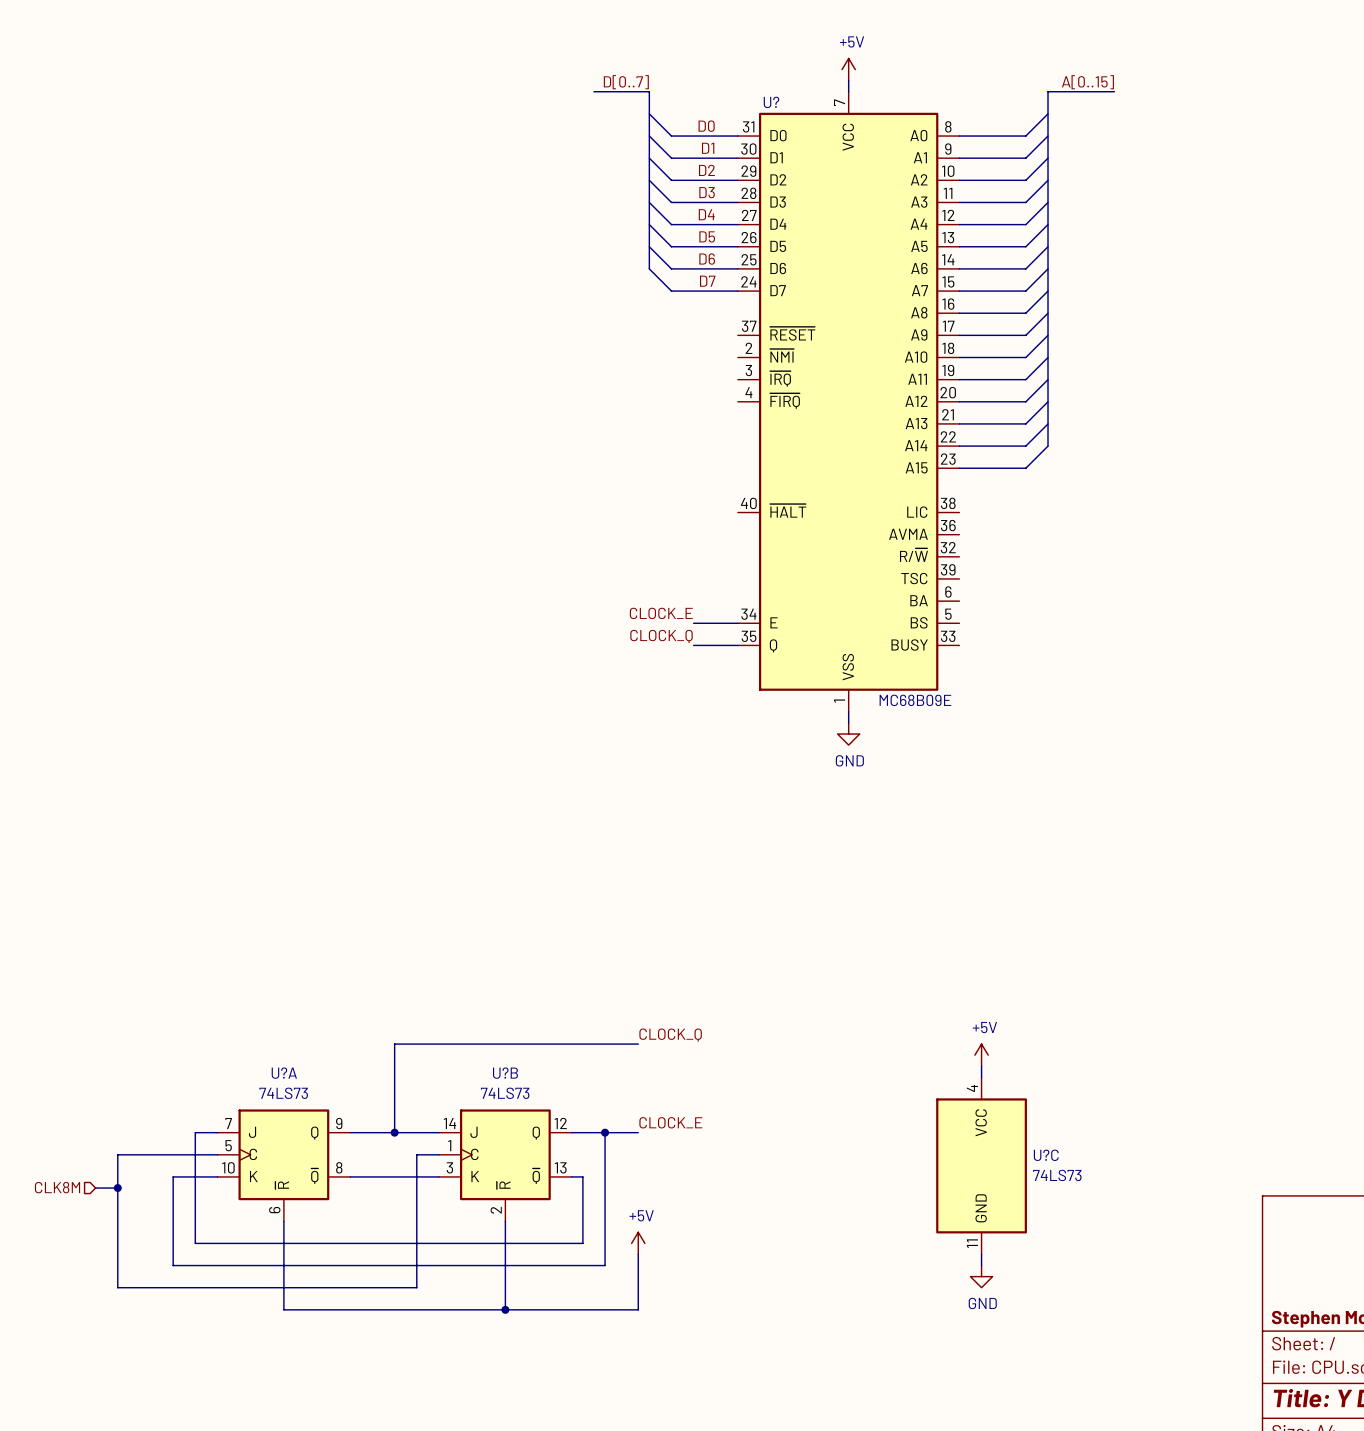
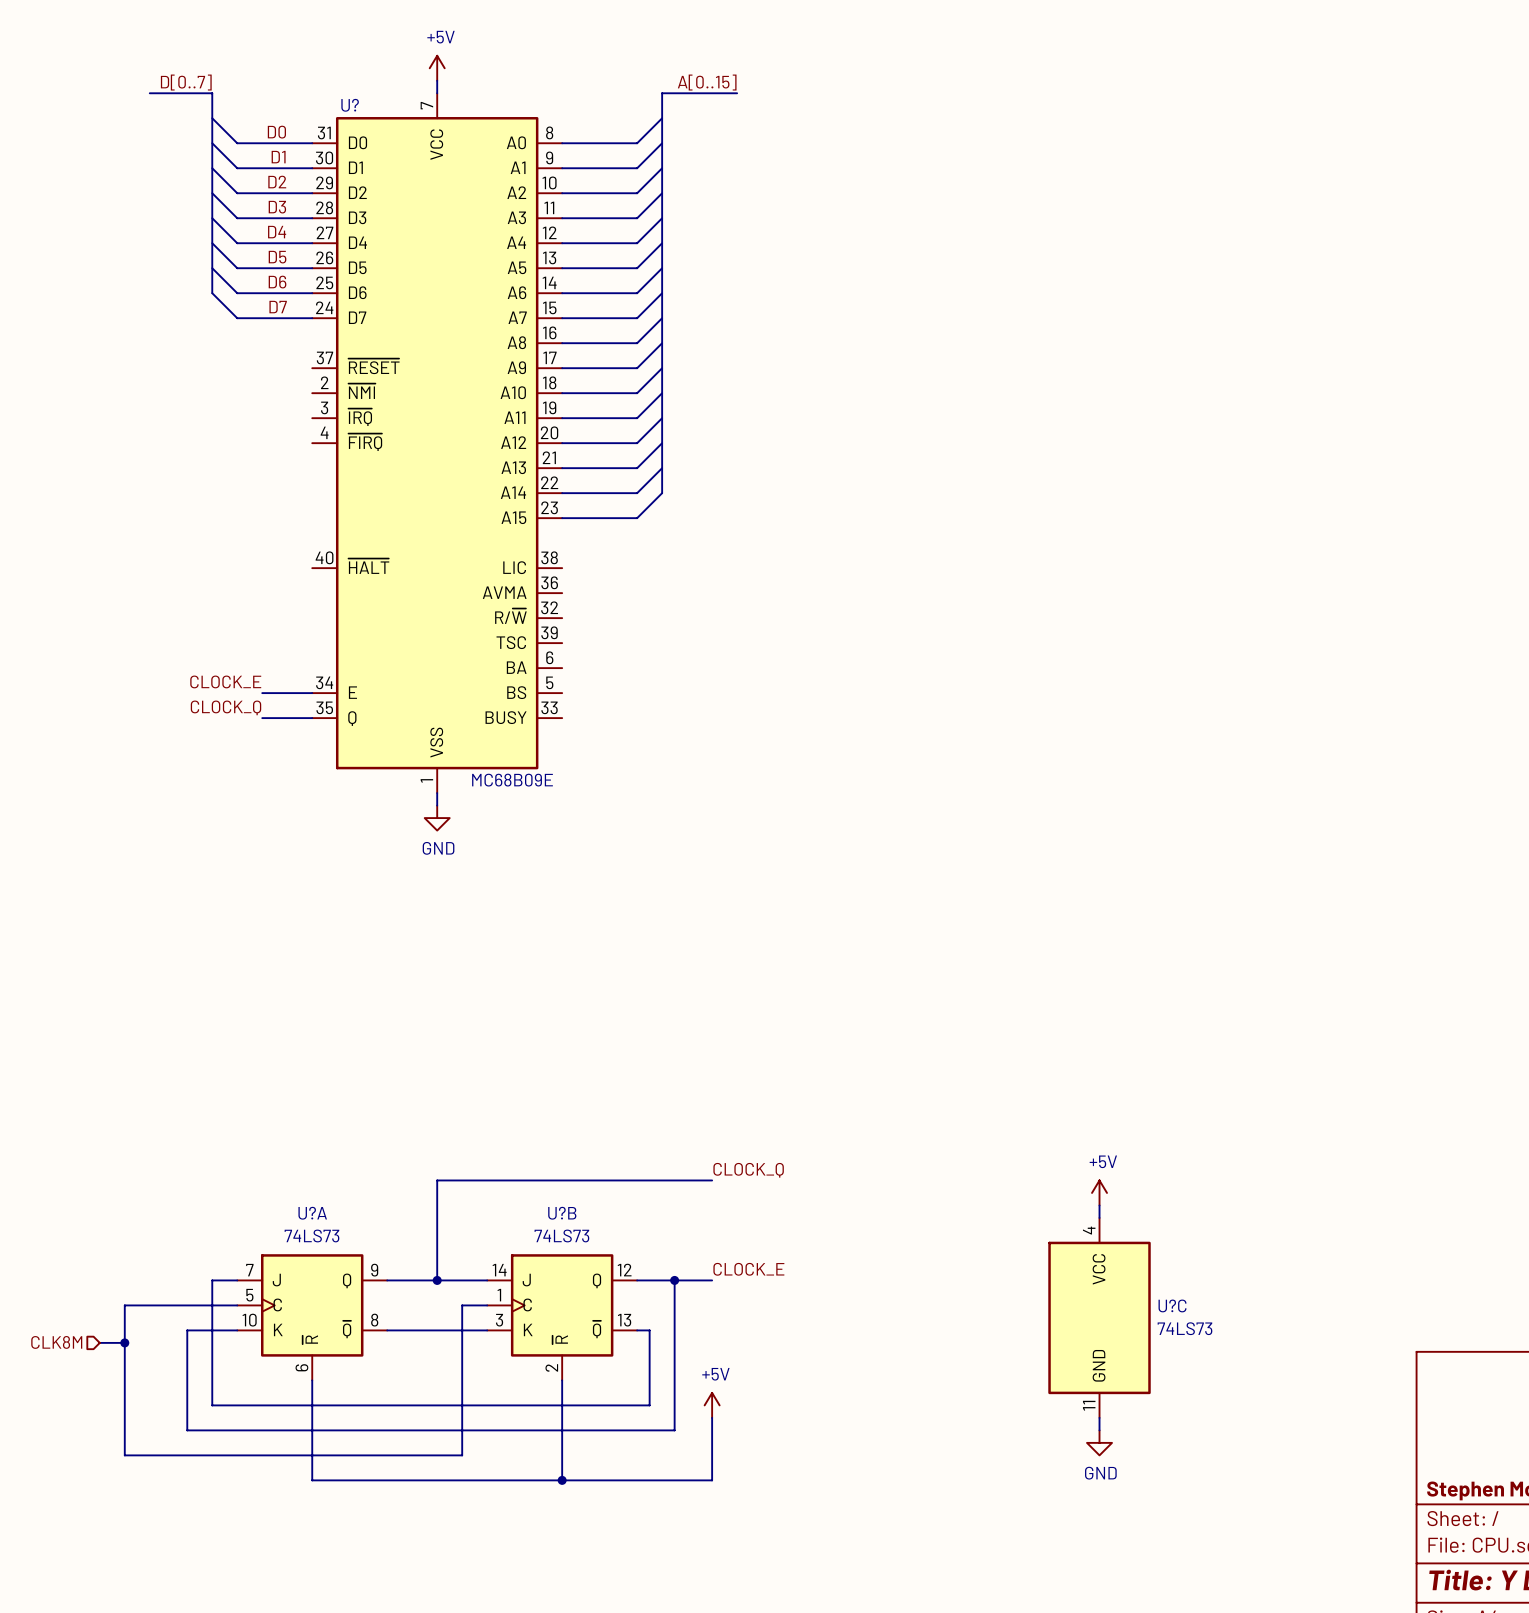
power symbol: none -> +5V (437, 68)
wire: none -> (437, 80) (437, 93)
power symbol: +5V (848, 69) -> none
label: none -> D[0..7] (186, 82)
bus: none -> (149, 93) (212, 93) (212, 293)
bus: none -> (737, 93) (662, 93) (662, 493)
wire: (848, 80) (848, 91) -> none
label: D[0..7] (626, 82) -> A[0..15] (707, 82)
label: A[0..15] (1087, 82) -> none
bus: (593, 91) (649, 91) (649, 268) -> none
bus: (1114, 91) (1048, 91) (1048, 446) -> none
wire: none -> (212, 118) (237, 143) (312, 143)
wire: none -> (662, 118) (637, 143) (562, 143)
wire: (649, 113) (671, 136) (737, 136) -> none
wire: (1048, 113) (1025, 136) (959, 136) -> none
label: none -> D0 (276, 132)
wire: none -> (212, 143) (237, 168) (312, 168)
wire: none -> (662, 143) (637, 168) (562, 168)
label: D0 (706, 126) -> none
wire: (649, 136) (671, 158) (737, 158) -> none
wire: (1048, 136) (1025, 158) (959, 158) -> none
label: none -> D1 (278, 157)
wire: none -> (212, 168) (237, 193) (312, 193)
wire: none -> (662, 168) (637, 193) (562, 193)
label: D1 (708, 148) -> none
wire: (649, 158) (671, 180) (737, 180) -> none
wire: (1048, 158) (1025, 180) (959, 180) -> none
label: none -> D2 (277, 182)
wire: none -> (212, 193) (237, 218) (312, 218)
wire: none -> (662, 193) (637, 218) (562, 218)
label: D2 (706, 170) -> none
wire: (649, 180) (671, 202) (737, 202) -> none
wire: (1048, 180) (1025, 202) (959, 202) -> none
label: none -> D3 (277, 207)
wire: none -> (212, 218) (237, 243) (312, 243)
wire: none -> (662, 218) (637, 243) (562, 243)
label: D3 (707, 192) -> none
wire: (649, 202) (671, 224) (737, 224) -> none
wire: (1048, 202) (1025, 224) (959, 224) -> none
label: none -> D4 (277, 232)
wire: none -> (212, 243) (237, 268) (312, 268)
wire: none -> (662, 243) (637, 268) (562, 268)
label: D4 (706, 214) -> none
wire: (649, 224) (671, 246) (737, 246) -> none
wire: (1048, 224) (1025, 246) (959, 246) -> none
label: none -> D5 (277, 257)
wire: none -> (212, 268) (237, 293) (312, 293)
wire: none -> (662, 268) (637, 293) (562, 293)
label: D5 (707, 236) -> none
wire: (649, 246) (671, 268) (737, 268) -> none
wire: (1048, 246) (1025, 268) (959, 268) -> none
label: none -> D6 (277, 282)
wire: none -> (212, 293) (237, 318) (312, 318)
wire: none -> (662, 293) (637, 318) (562, 318)
label: D6 (707, 259) -> none
wire: (649, 268) (671, 291) (737, 291) -> none
wire: (1048, 268) (1025, 291) (959, 291) -> none
label: none -> D7 (278, 307)
wire: none -> (662, 318) (637, 343) (562, 343)
label: D7 (707, 281) -> none
wire: (1048, 291) (1025, 313) (959, 313) -> none
wire: none -> (662, 343) (637, 368) (562, 368)
wire: (1048, 313) (1025, 335) (959, 335) -> none
wire: none -> (662, 368) (637, 393) (562, 393)
wire: (1048, 335) (1025, 357) (959, 357) -> none
wire: none -> (662, 393) (637, 418) (562, 418)
wire: (1048, 357) (1025, 379) (959, 379) -> none
wire: none -> (662, 418) (637, 443) (562, 443)
wire: (1048, 379) (1025, 401) (959, 401) -> none
U?: none -> MC68B09E (437, 443)
wire: none -> (662, 443) (637, 468) (562, 468)
U?: MC68B09E (848, 401) -> none
wire: (1048, 401) (1025, 423) (959, 423) -> none
wire: none -> (662, 468) (637, 493) (562, 493)
wire: (1048, 423) (1025, 446) (959, 446) -> none
wire: none -> (662, 493) (637, 518) (562, 518)
wire: (1048, 446) (1025, 468) (959, 468) -> none
label: none -> CLOCK_E (225, 681)
wire: none -> (262, 693) (312, 693)
label: CLOCK_E (661, 613) -> none
wire: (693, 623) (737, 623) -> none
label: none -> CLOCK_Q (226, 707)
wire: none -> (262, 718) (312, 718)
label: CLOCK_Q (661, 636) -> none
wire: (693, 645) (737, 645) -> none
wire: none -> (437, 793) (437, 805)
wire: (848, 711) (848, 722) -> none
power symbol: none -> GND (437, 818)
power symbol: GND (848, 734) -> none

